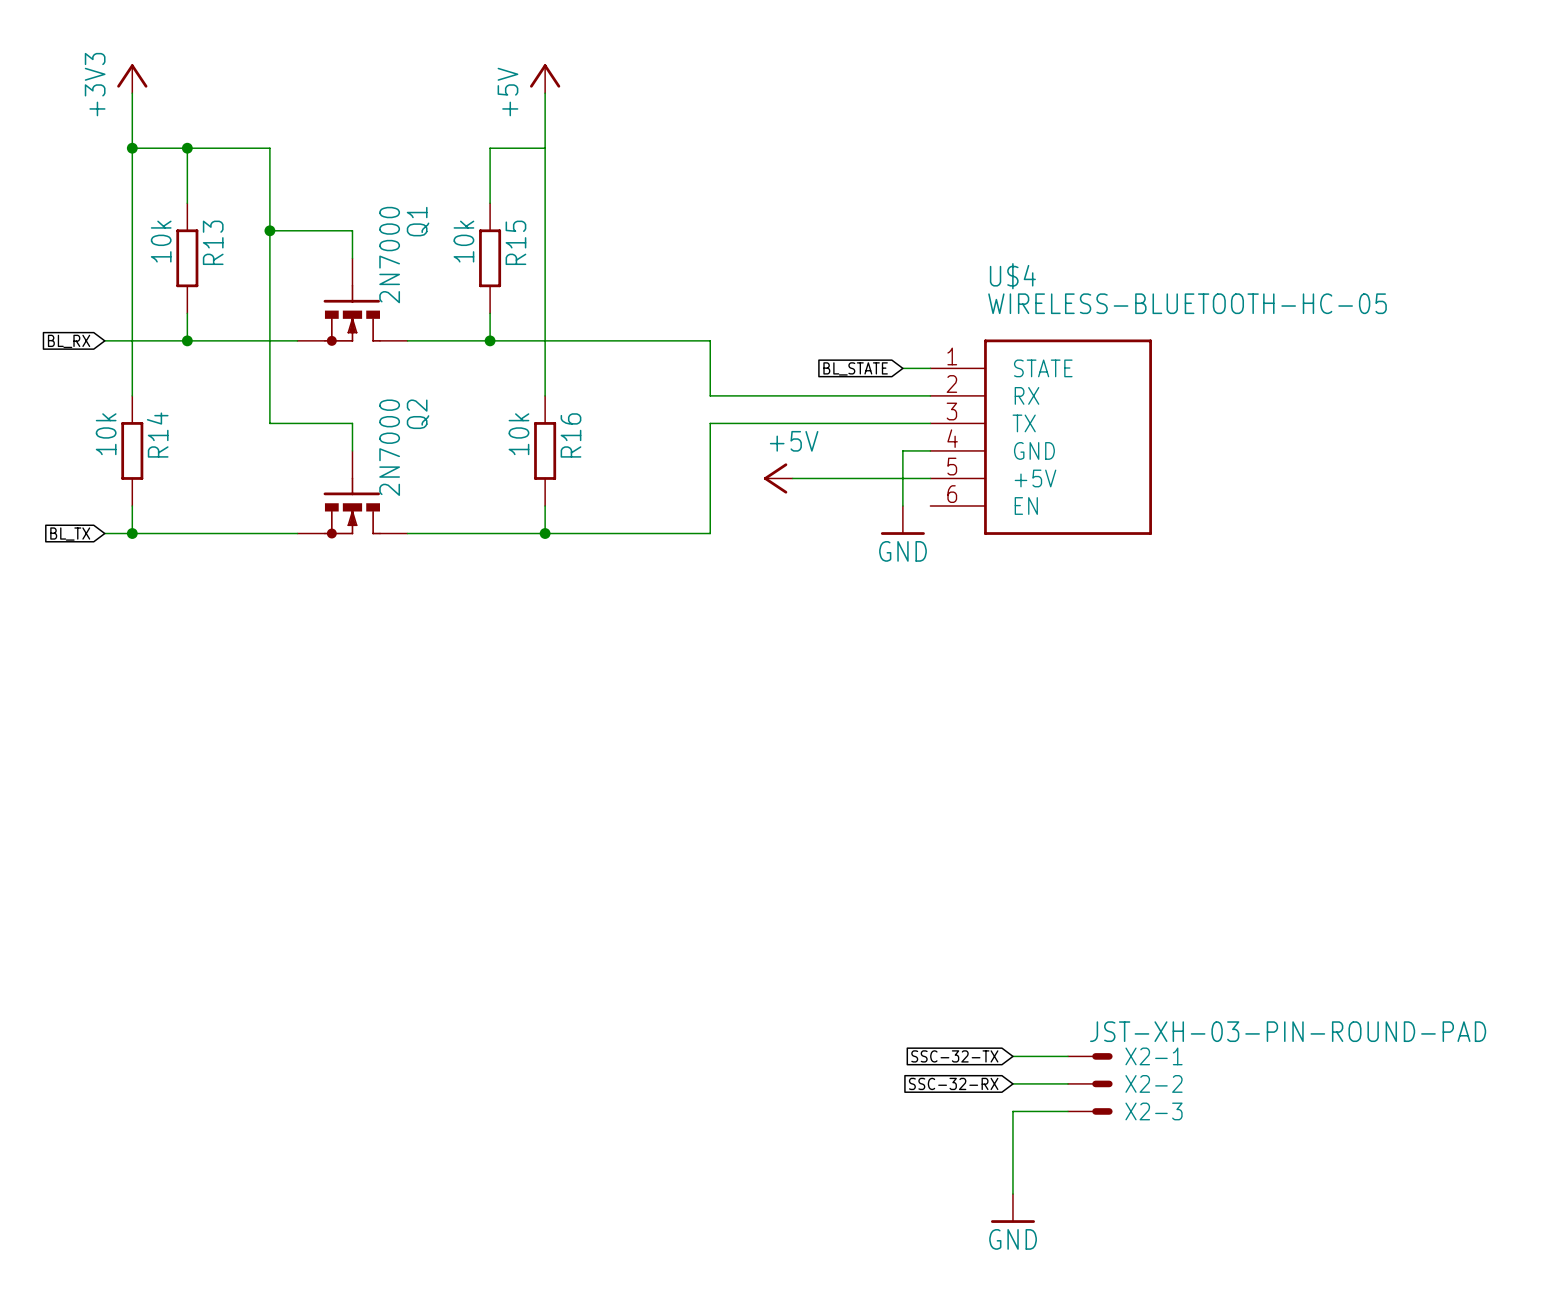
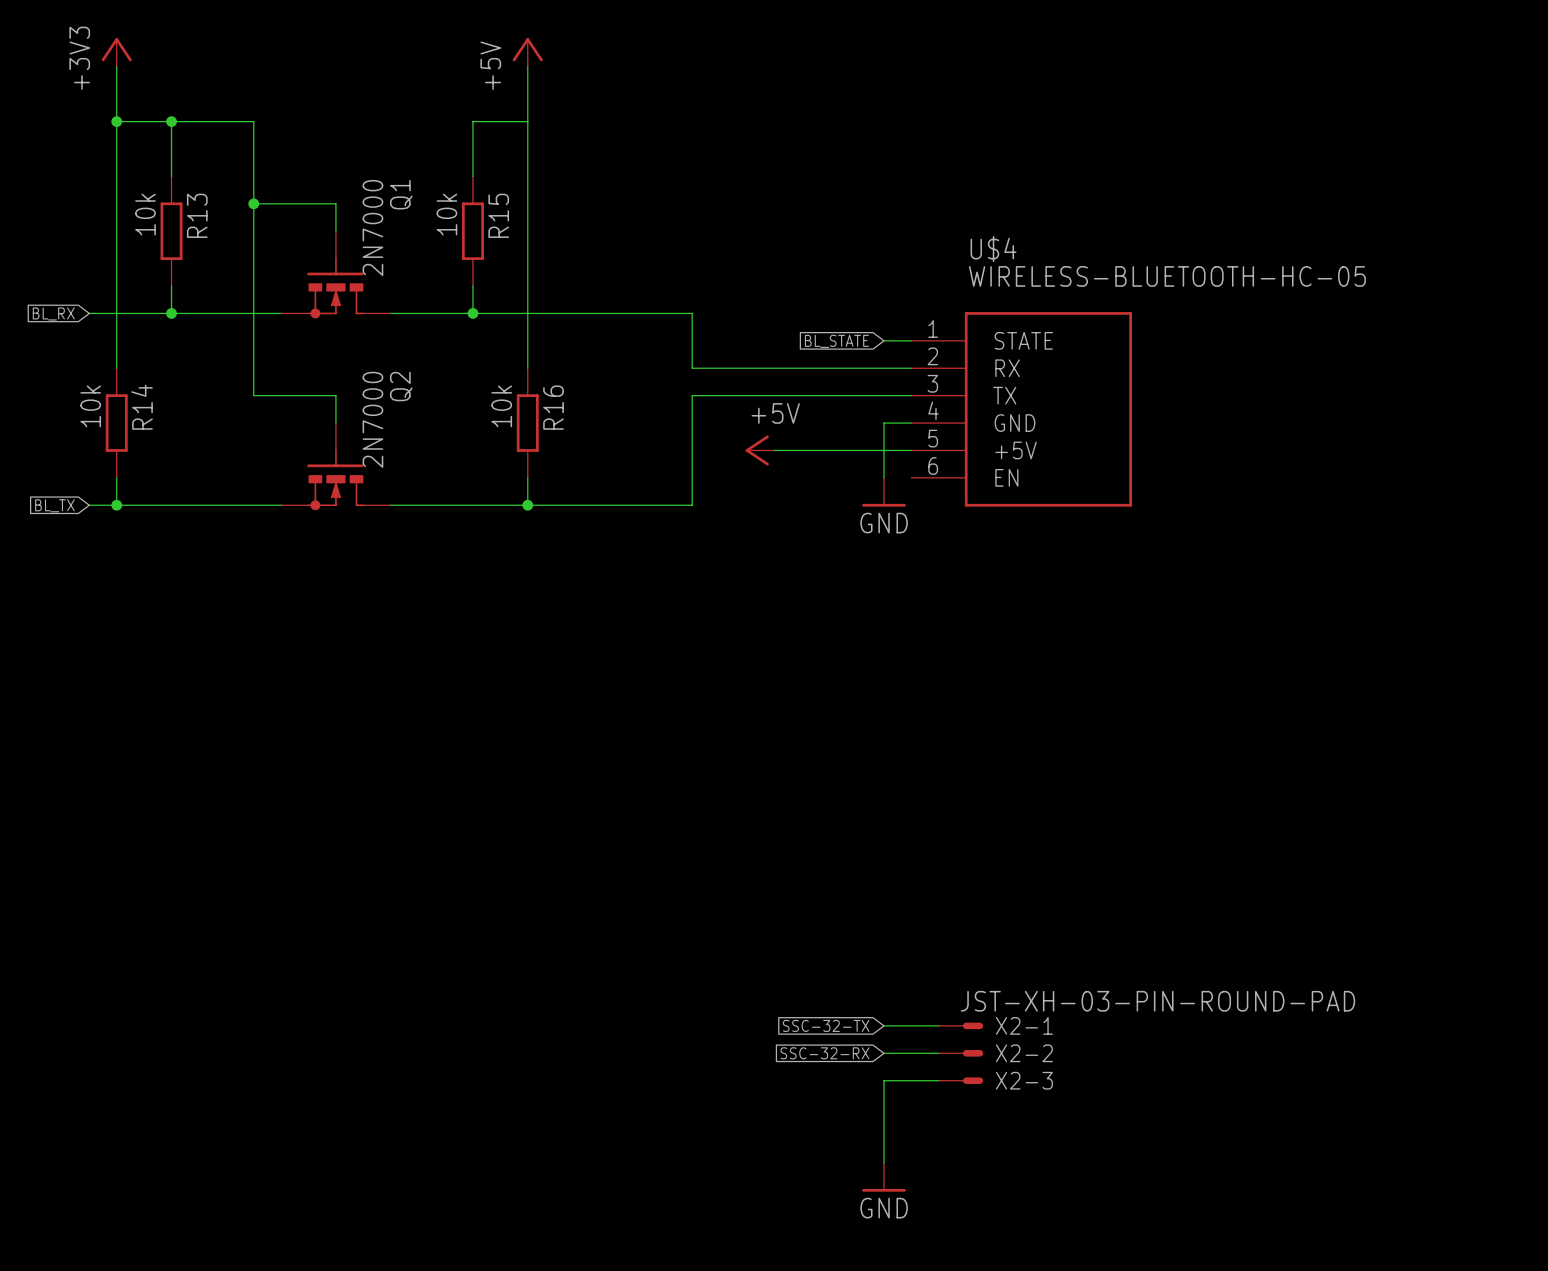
global label position: SSC-32-TX (954, 1056) -> SSC-32-TX (826, 1025)
wire: (1012, 1056) (1068, 1056) -> (884, 1025) (938, 1025)
X2-1 position: (1090, 1056) -> (961, 1025)
global label position: SSC-32-RX (953, 1083) -> SSC-32-RX (824, 1053)
wire: (1012, 1083) (1068, 1083) -> (884, 1053) (938, 1053)
X2-2 position: (1090, 1083) -> (961, 1053)
wire: (1068, 1111) (1012, 1111) (1012, 1194) -> (938, 1080) (884, 1080) (884, 1162)
X2-3 position: (1090, 1111) -> (961, 1080)
power symbol position: GND (1012, 1208) -> GND (884, 1177)

